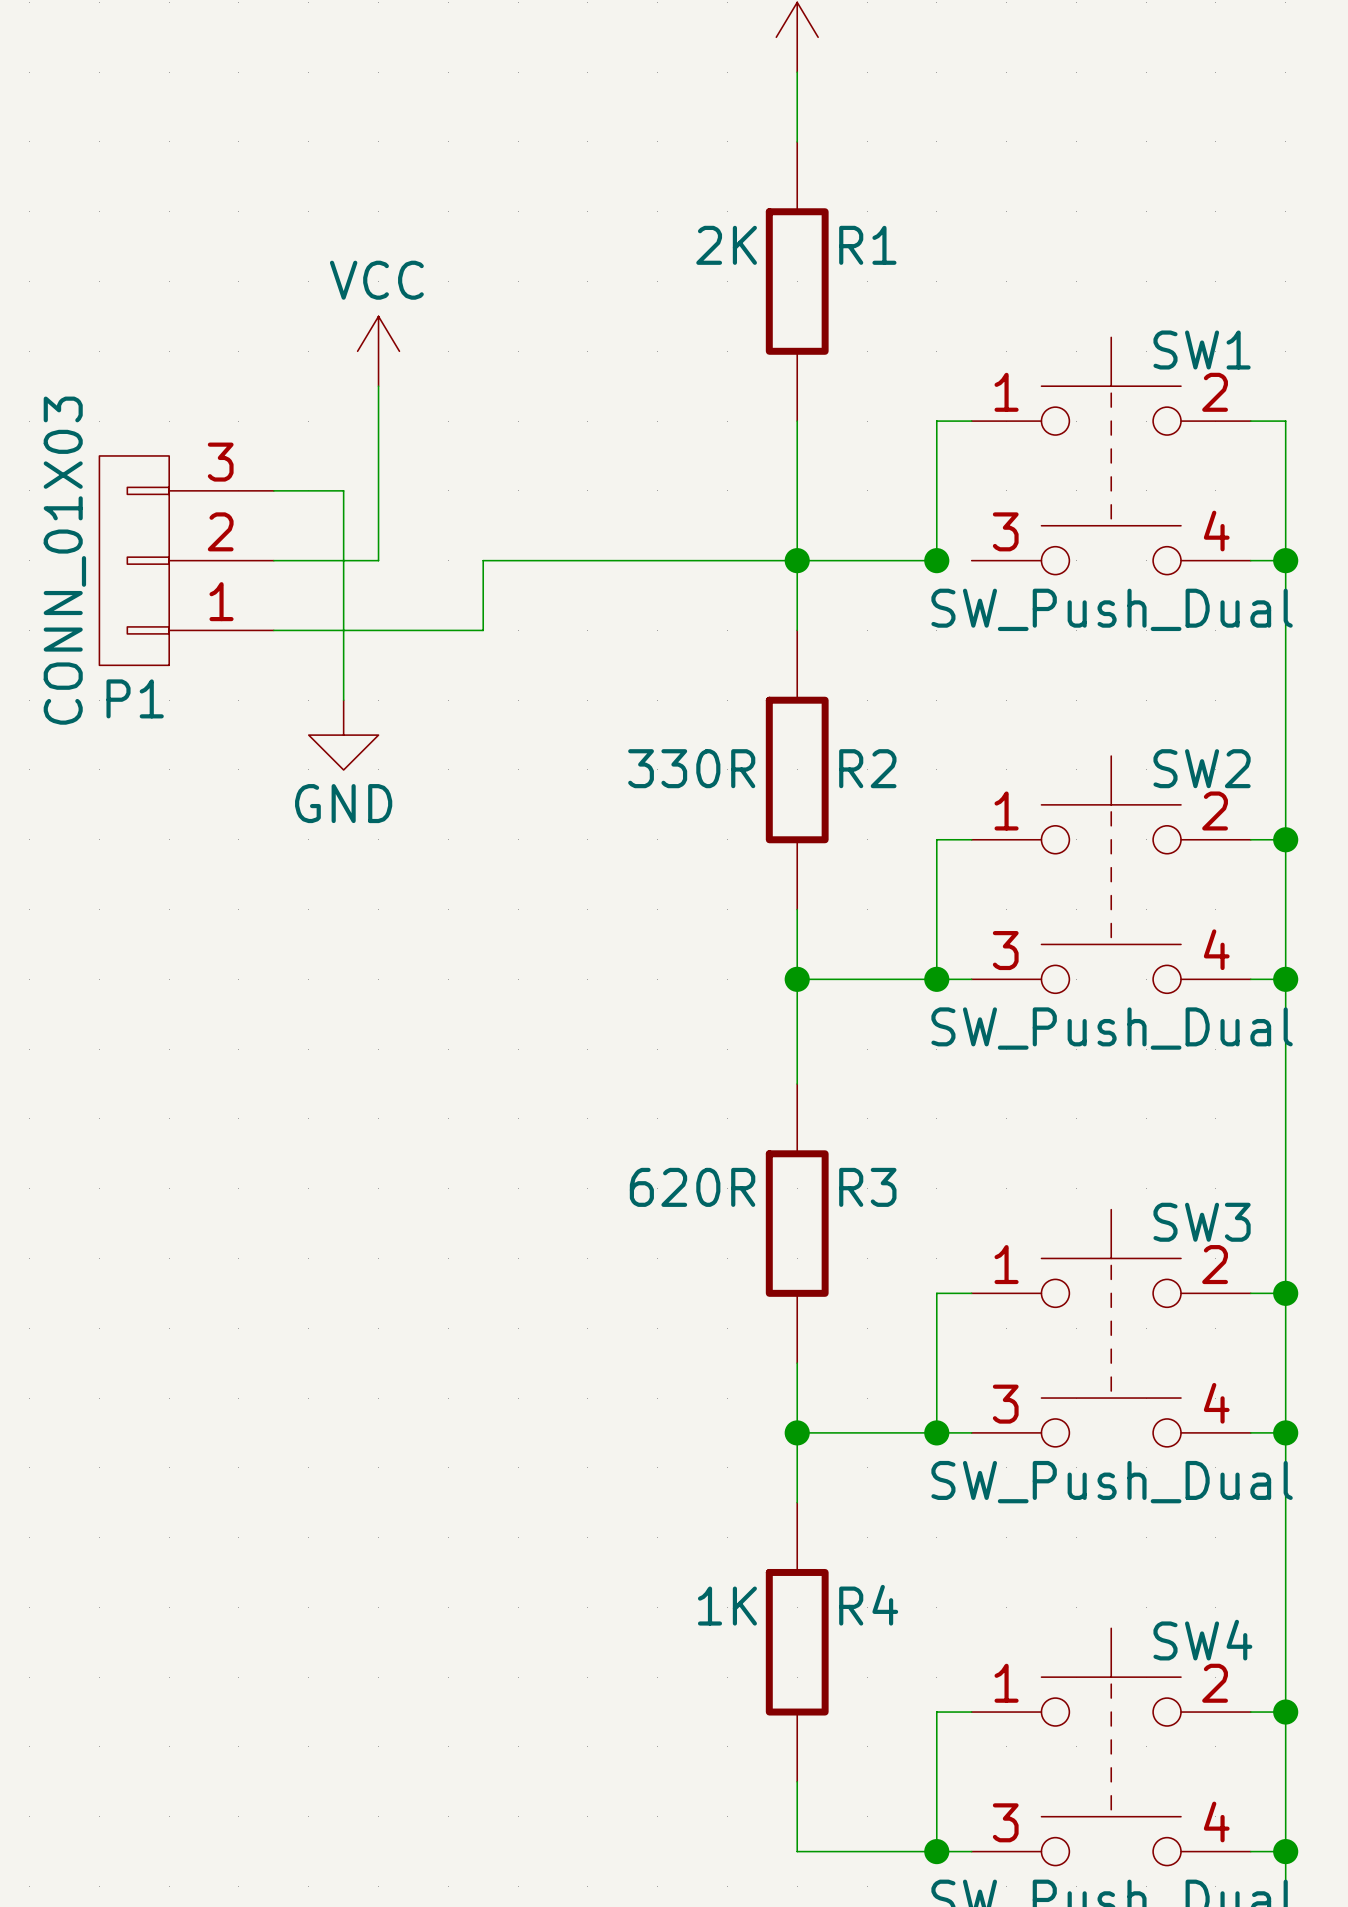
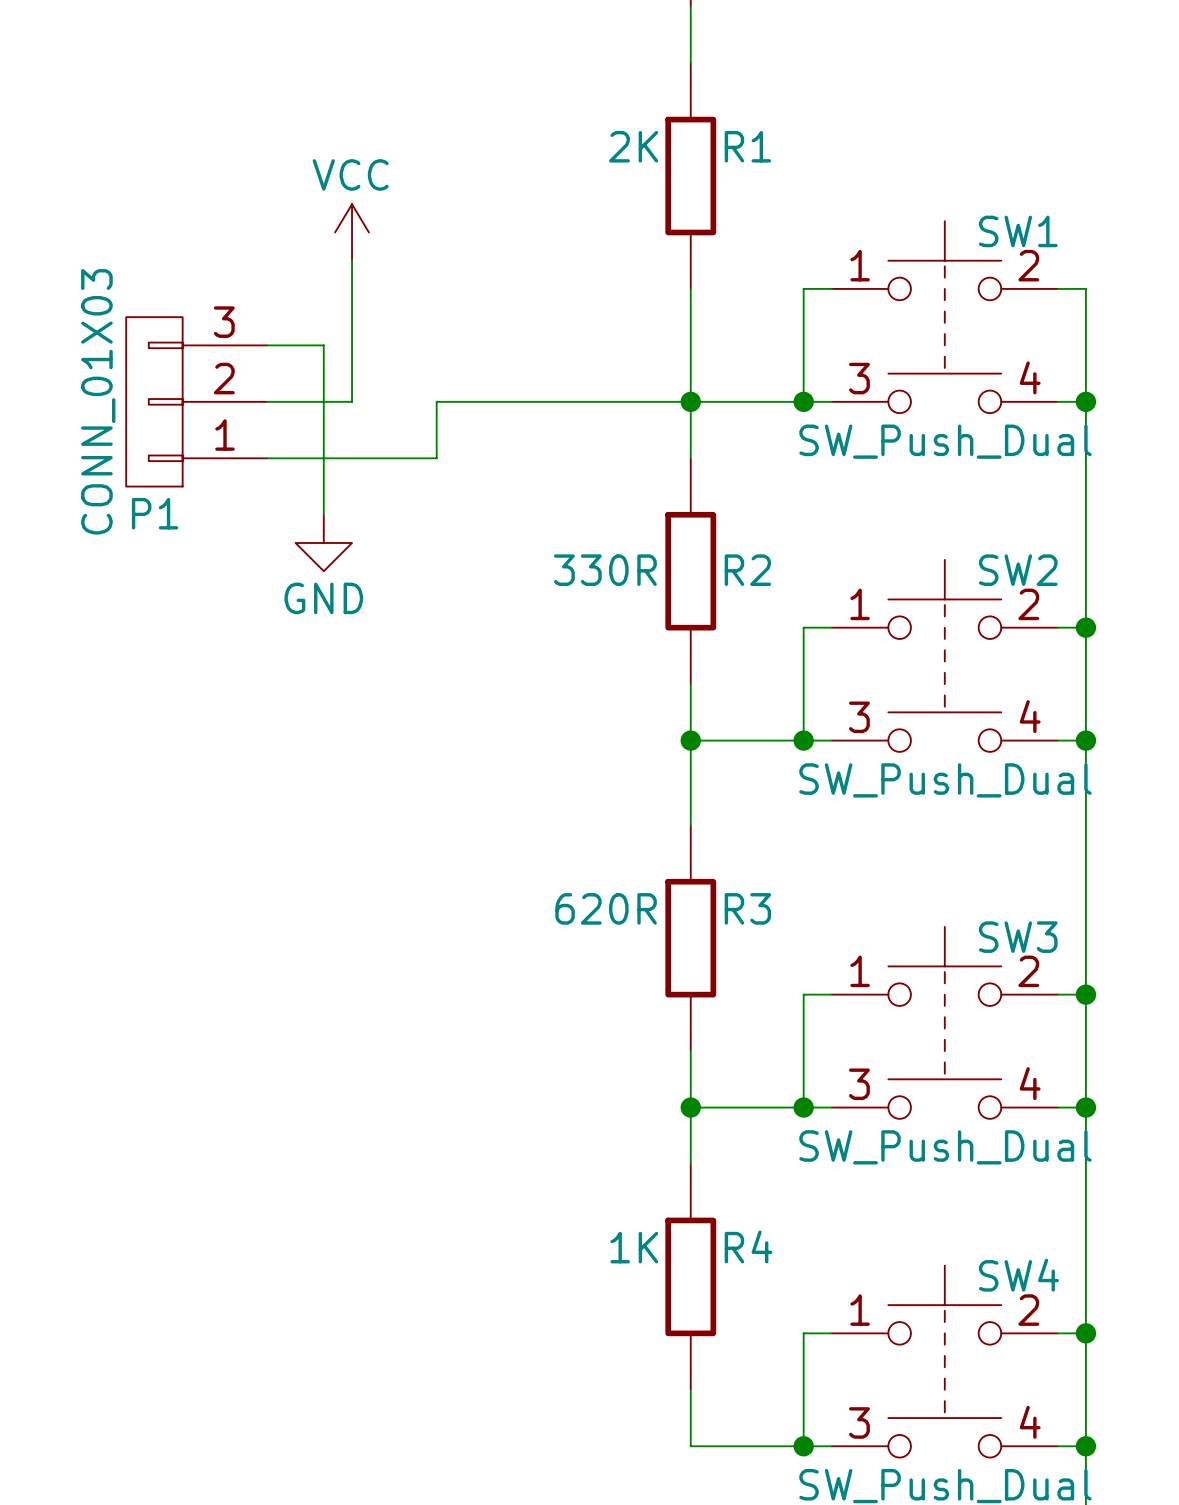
wire: none -> (803, 401) (831, 401)

